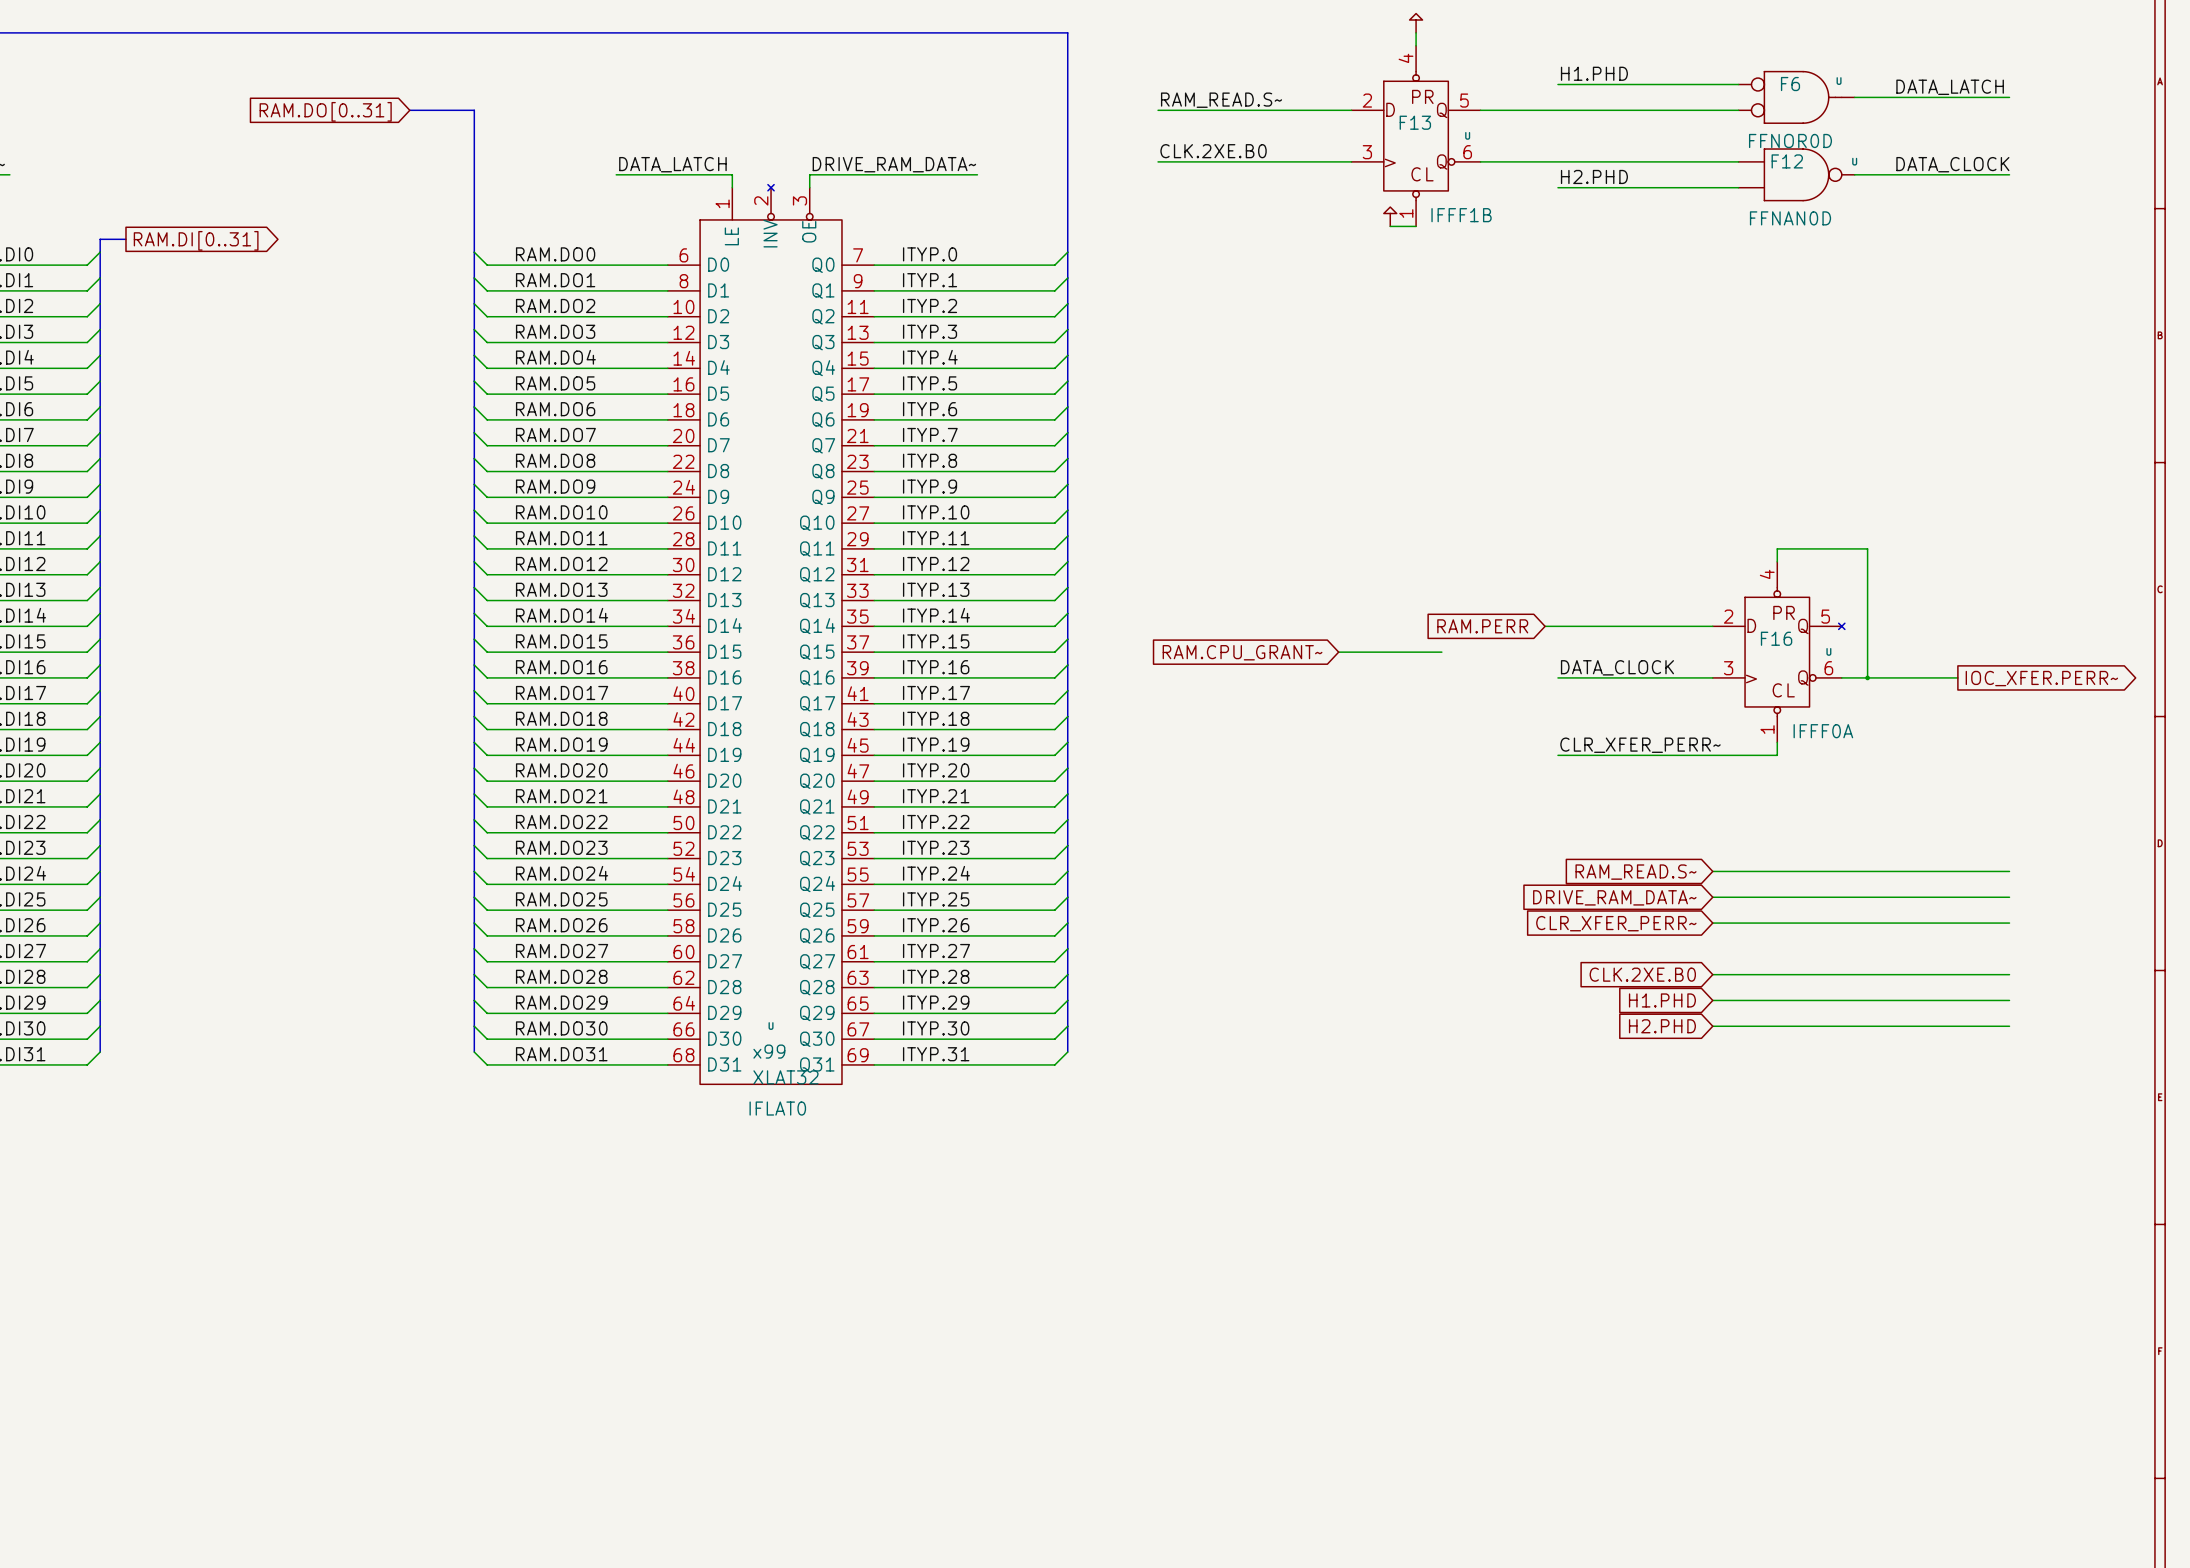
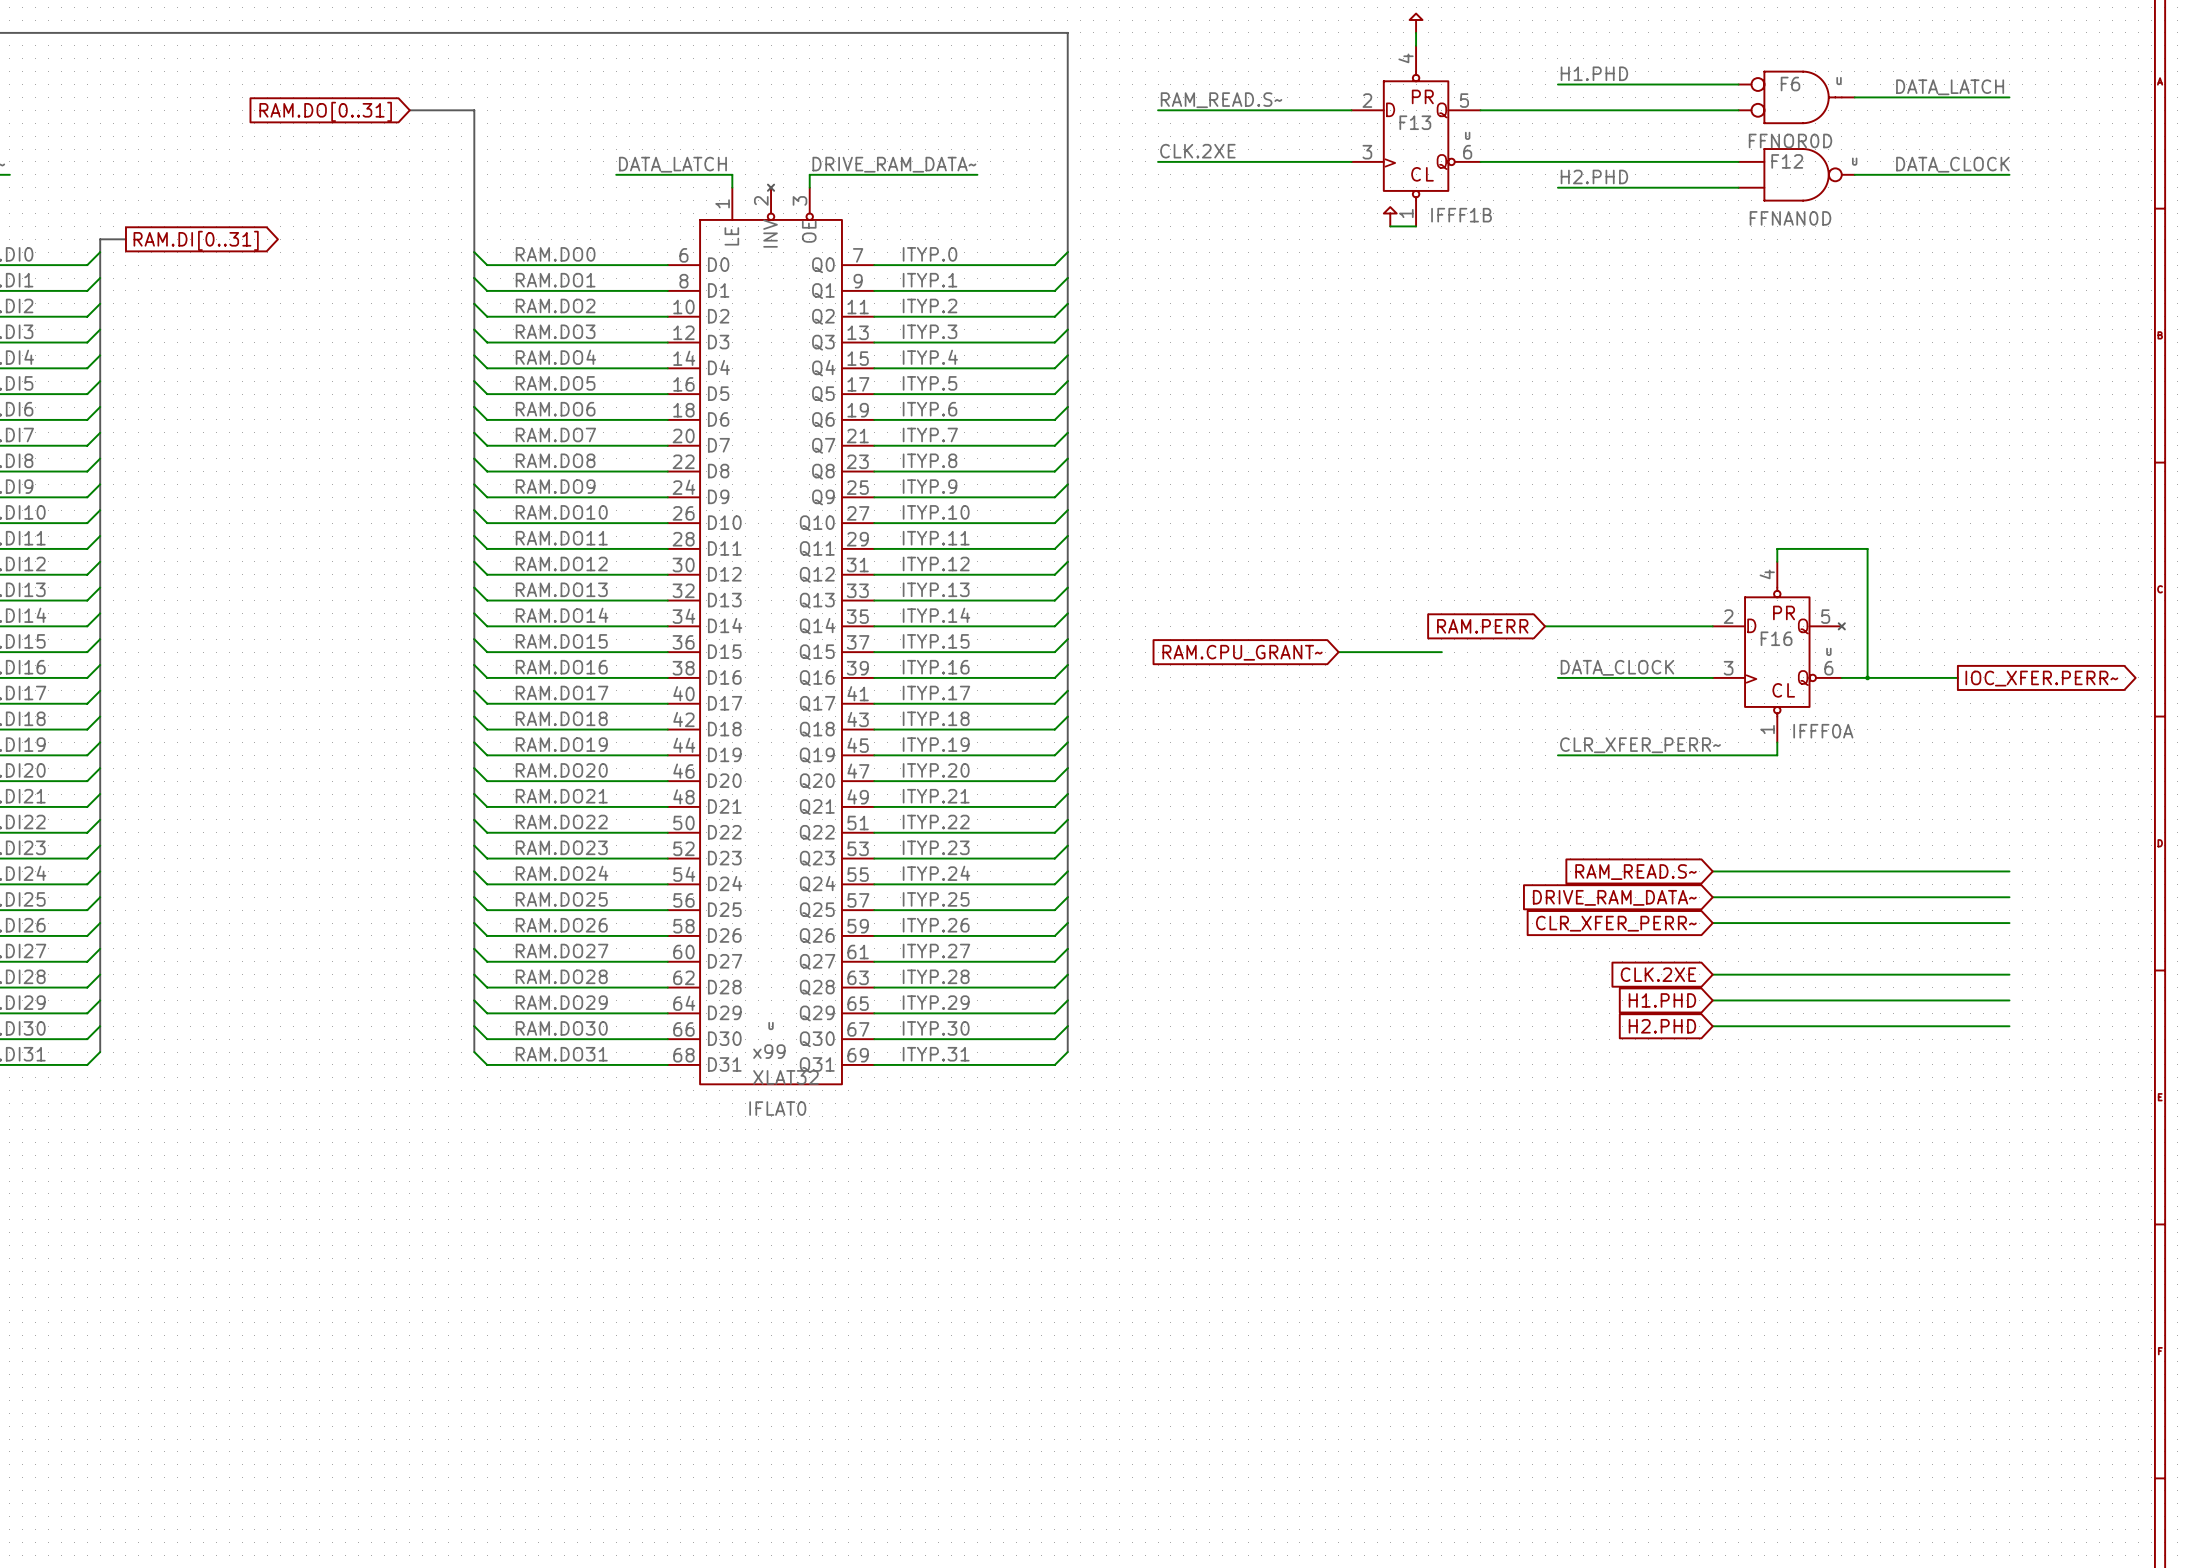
label: CLK.2XE.B0 (1213, 151) -> CLK.2XE (1197, 151)
global label: CLK.2XE.B0 (1642, 974) -> CLK.2XE (1658, 974)

